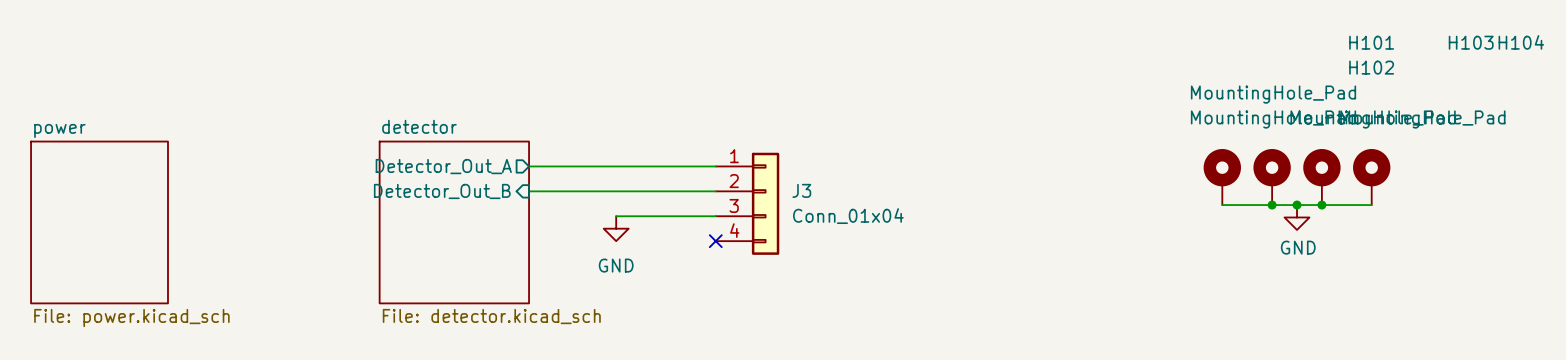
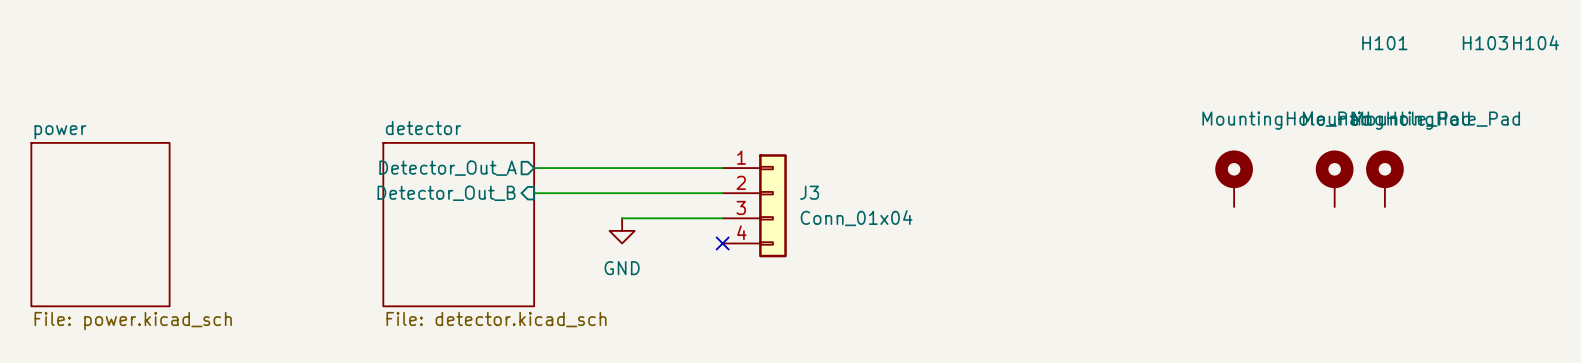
H102: MountingHole_Pad (1272, 177) -> none
wire: (1222, 205) (1371, 205) -> none
junction: (1272, 205) -> none
junction: (1297, 205) -> none
junction: (1321, 205) -> none
power symbol: GND (1297, 217) -> none

